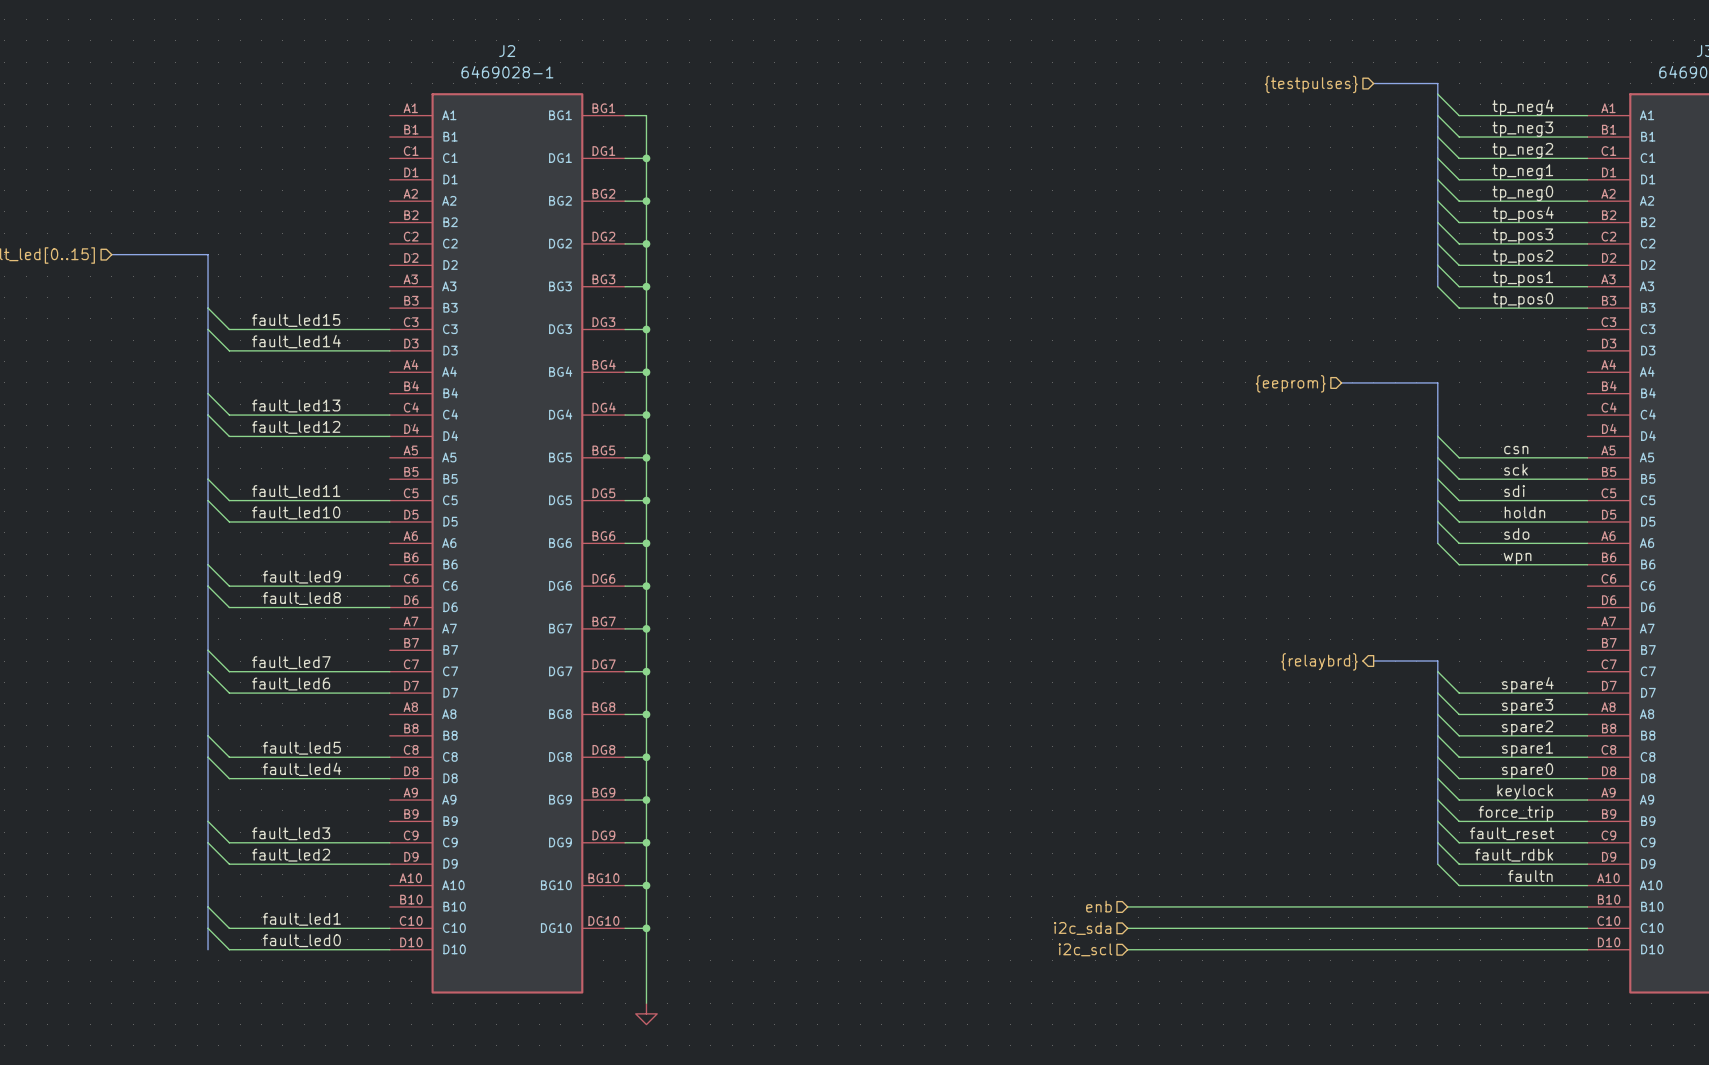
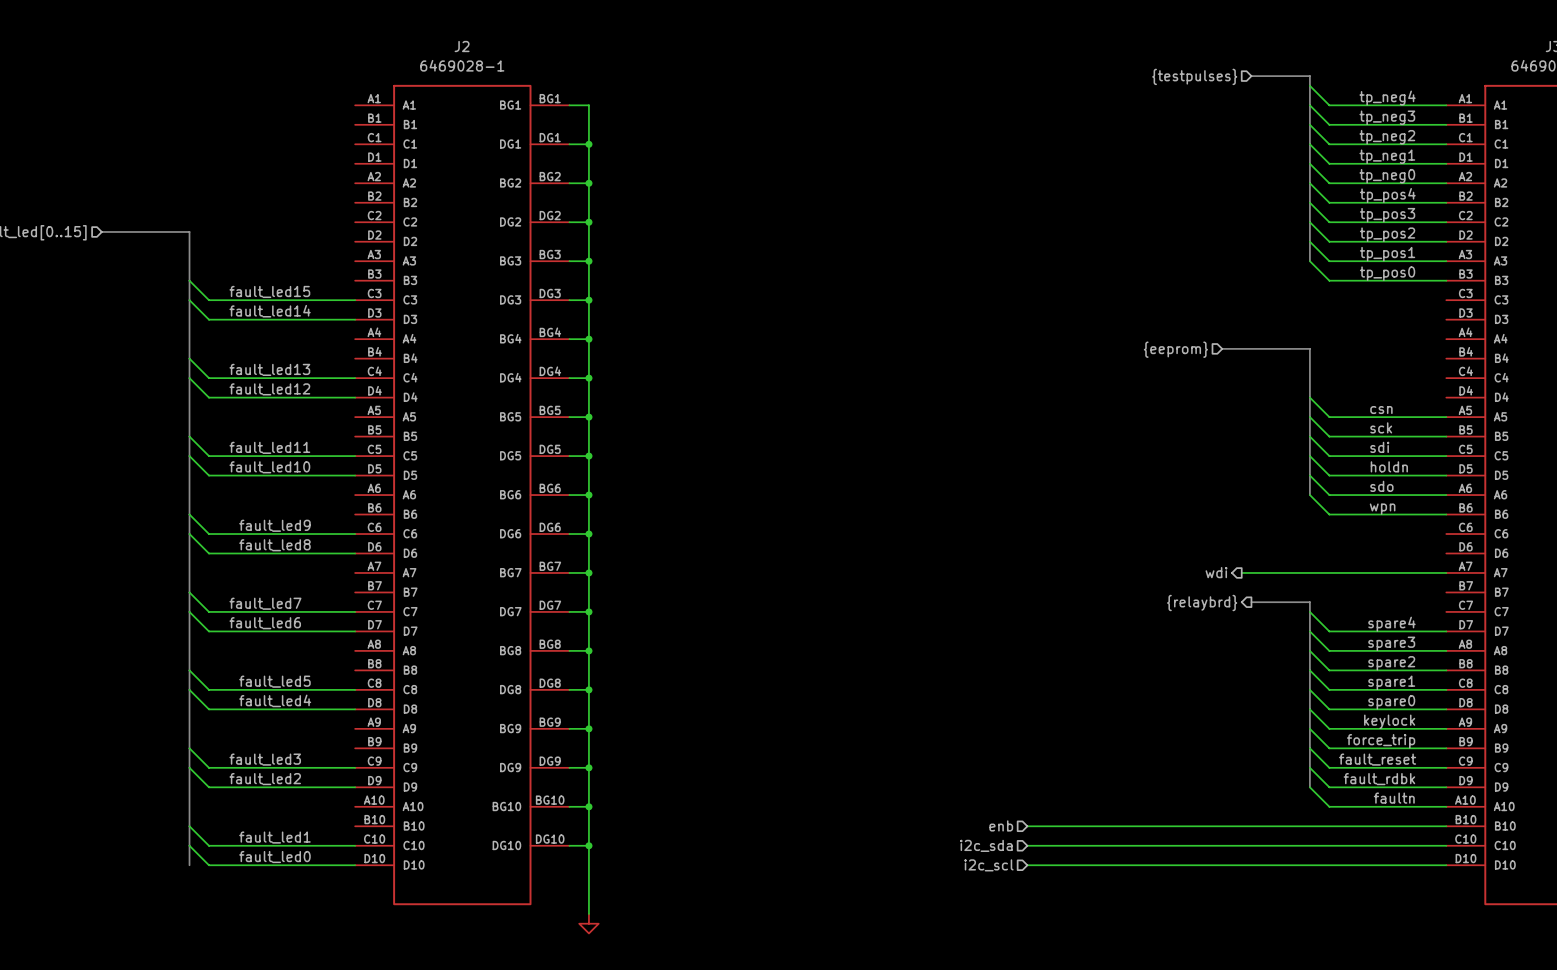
hierarchical label: none -> wdi (1216, 572)
wire: none -> (1241, 572) (1446, 572)

